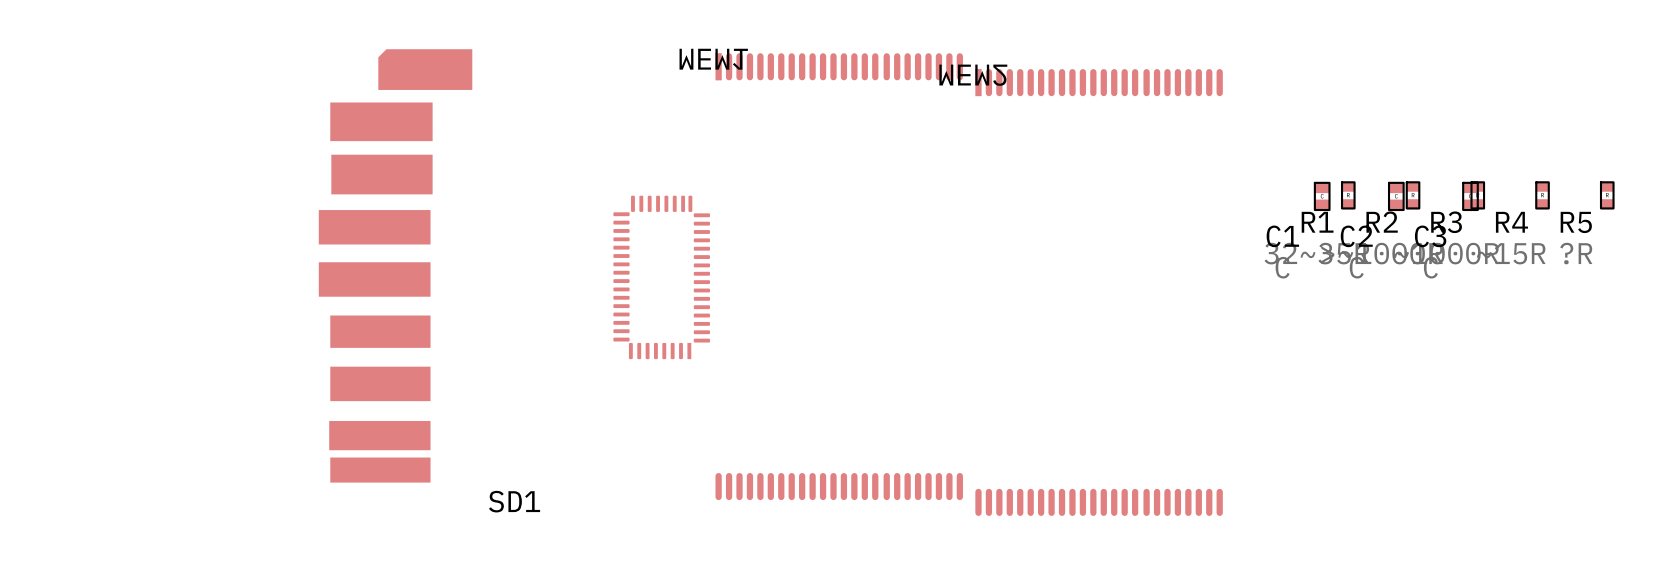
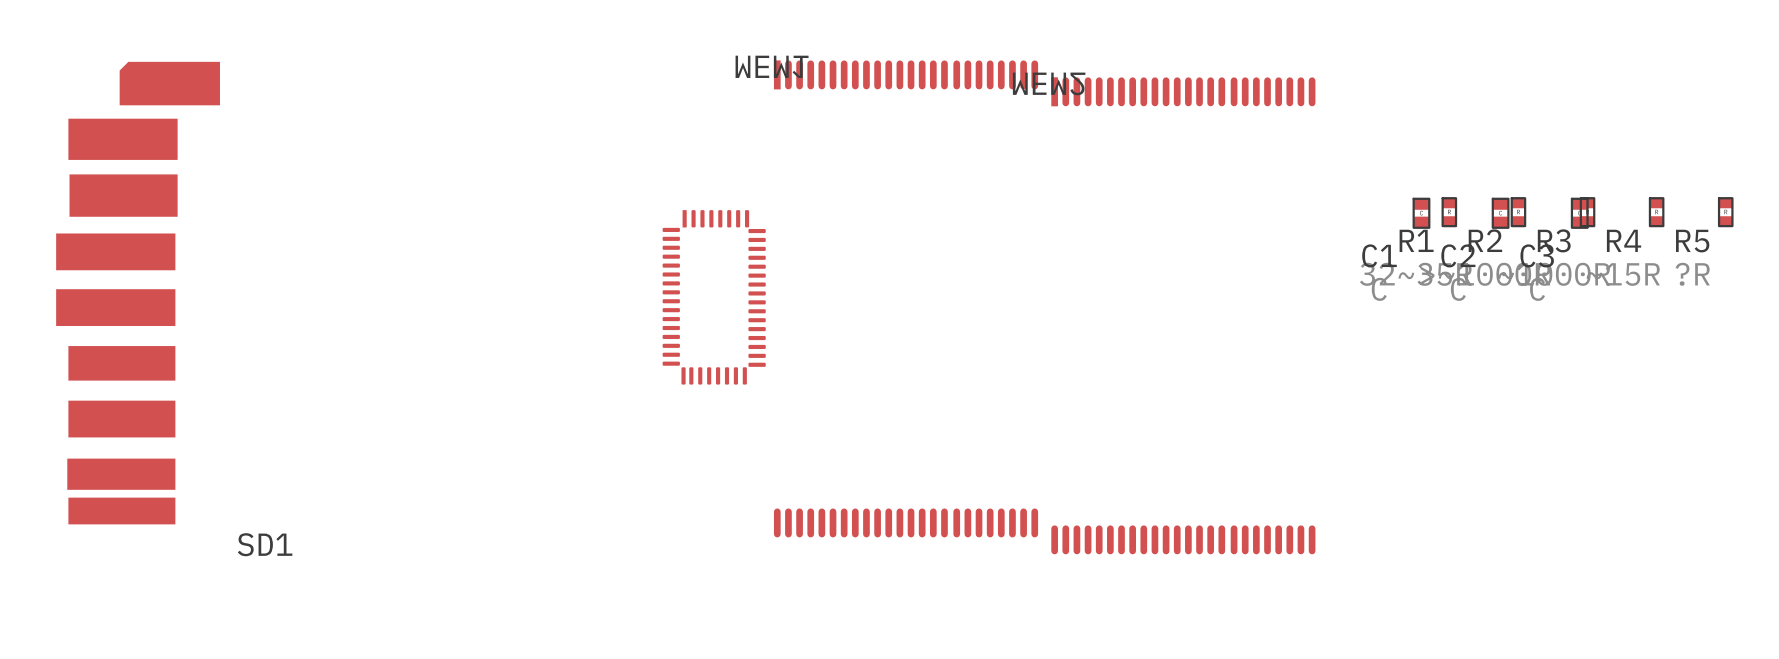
SD1 position: (395, 265) -> (138, 293)
part rotation: 0° (661, 277) -> 180° (714, 297)

